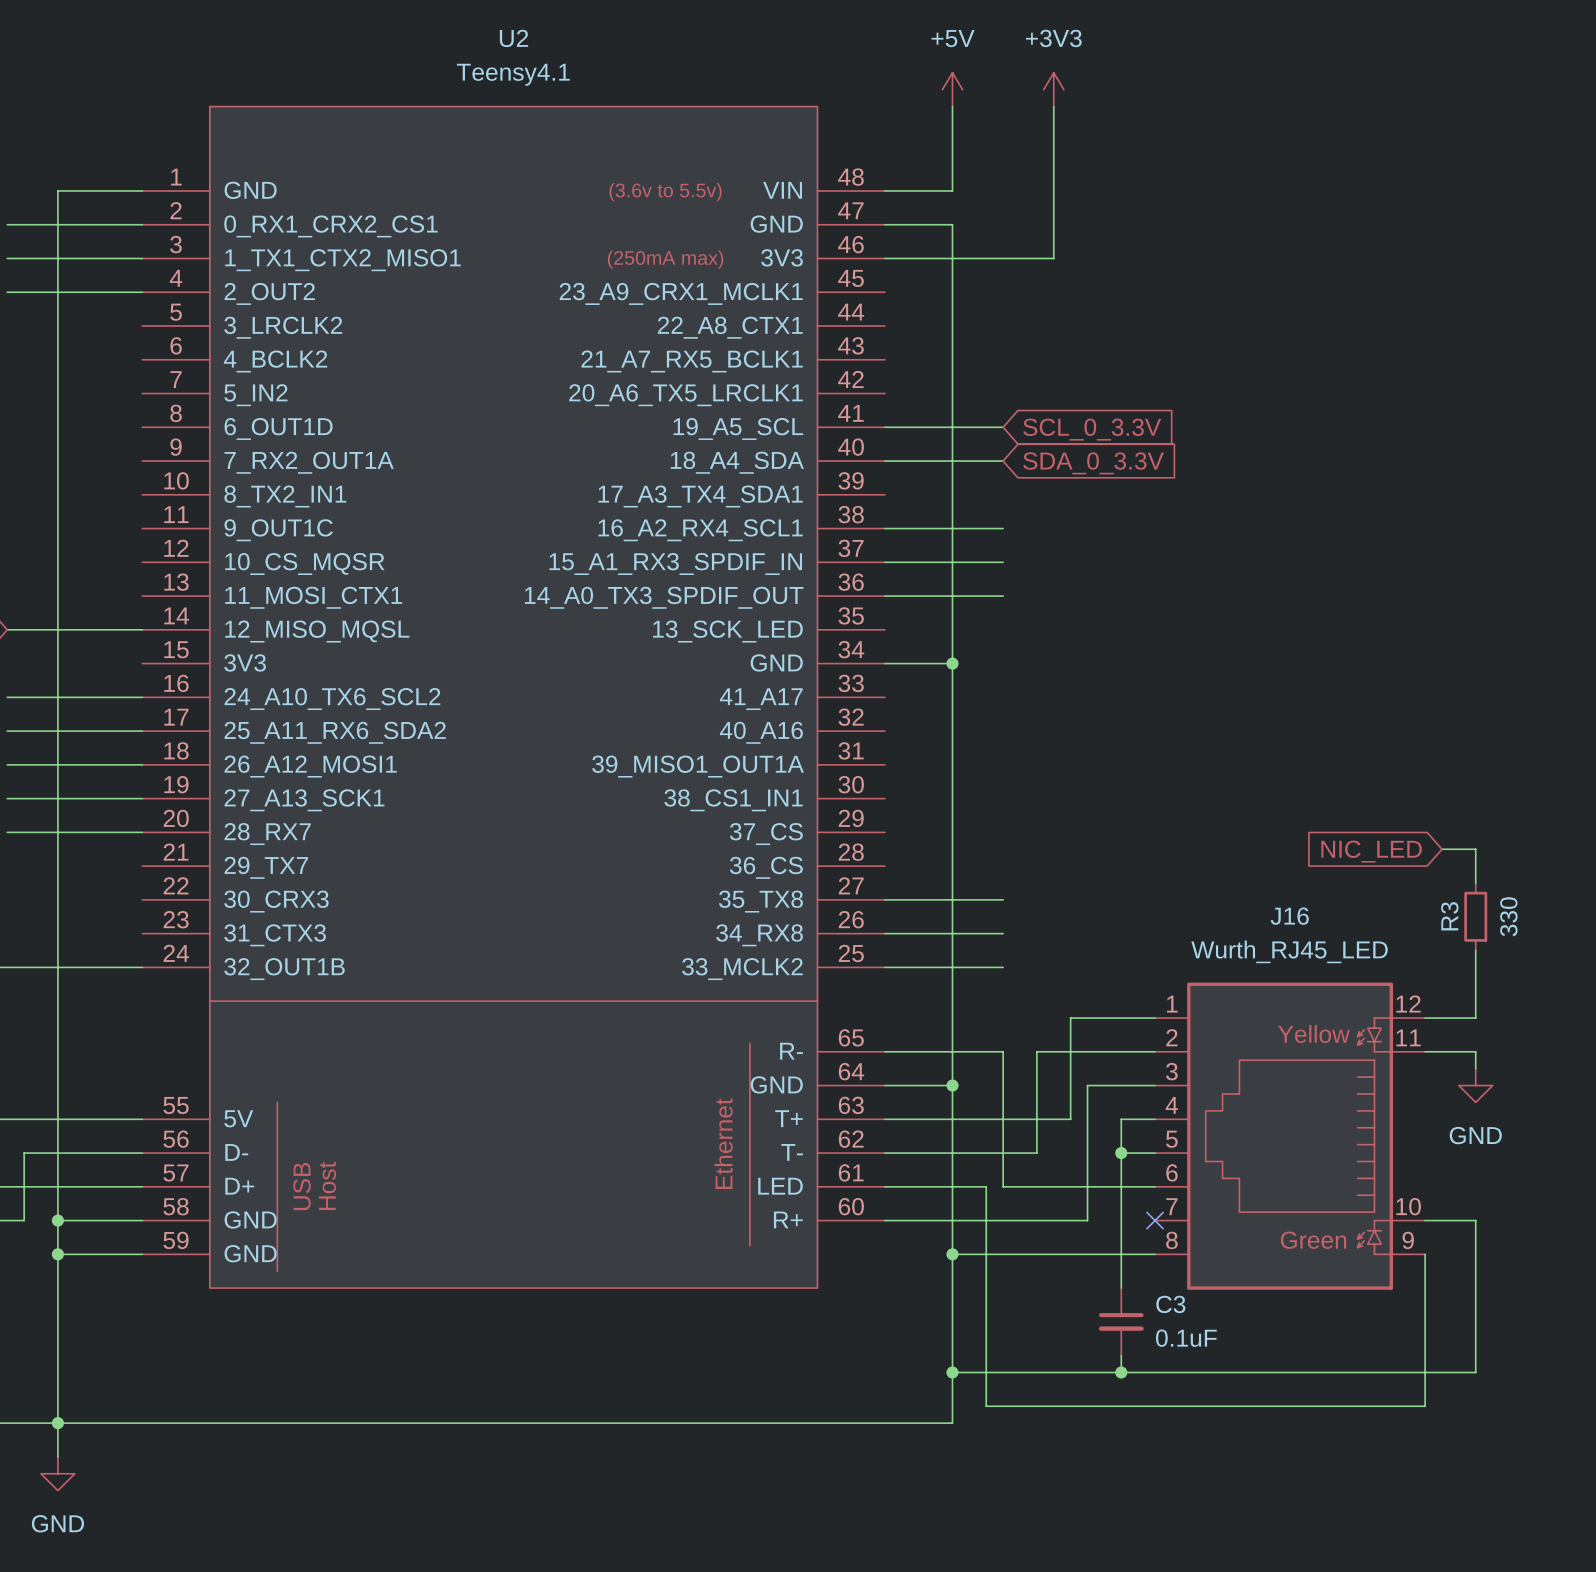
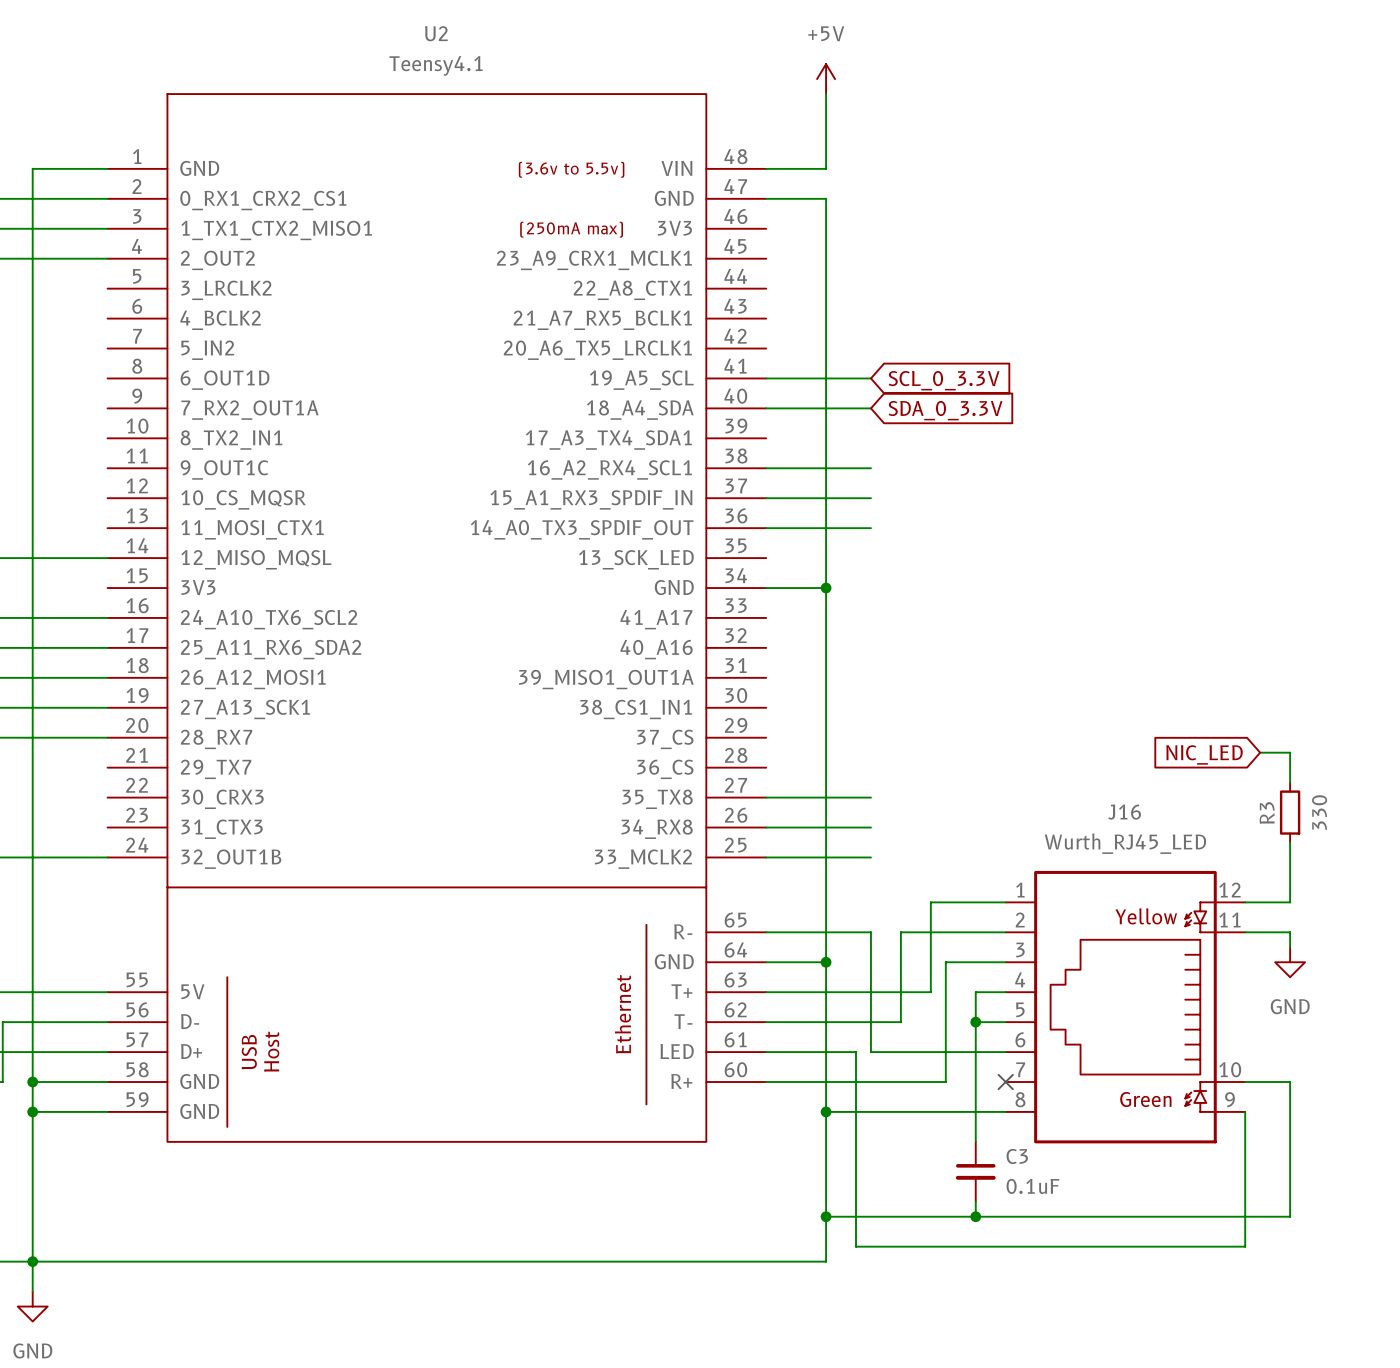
power symbol: +3V3 (1053, 89) -> none
wire: (1053, 106) (1053, 258) (884, 258) -> none

